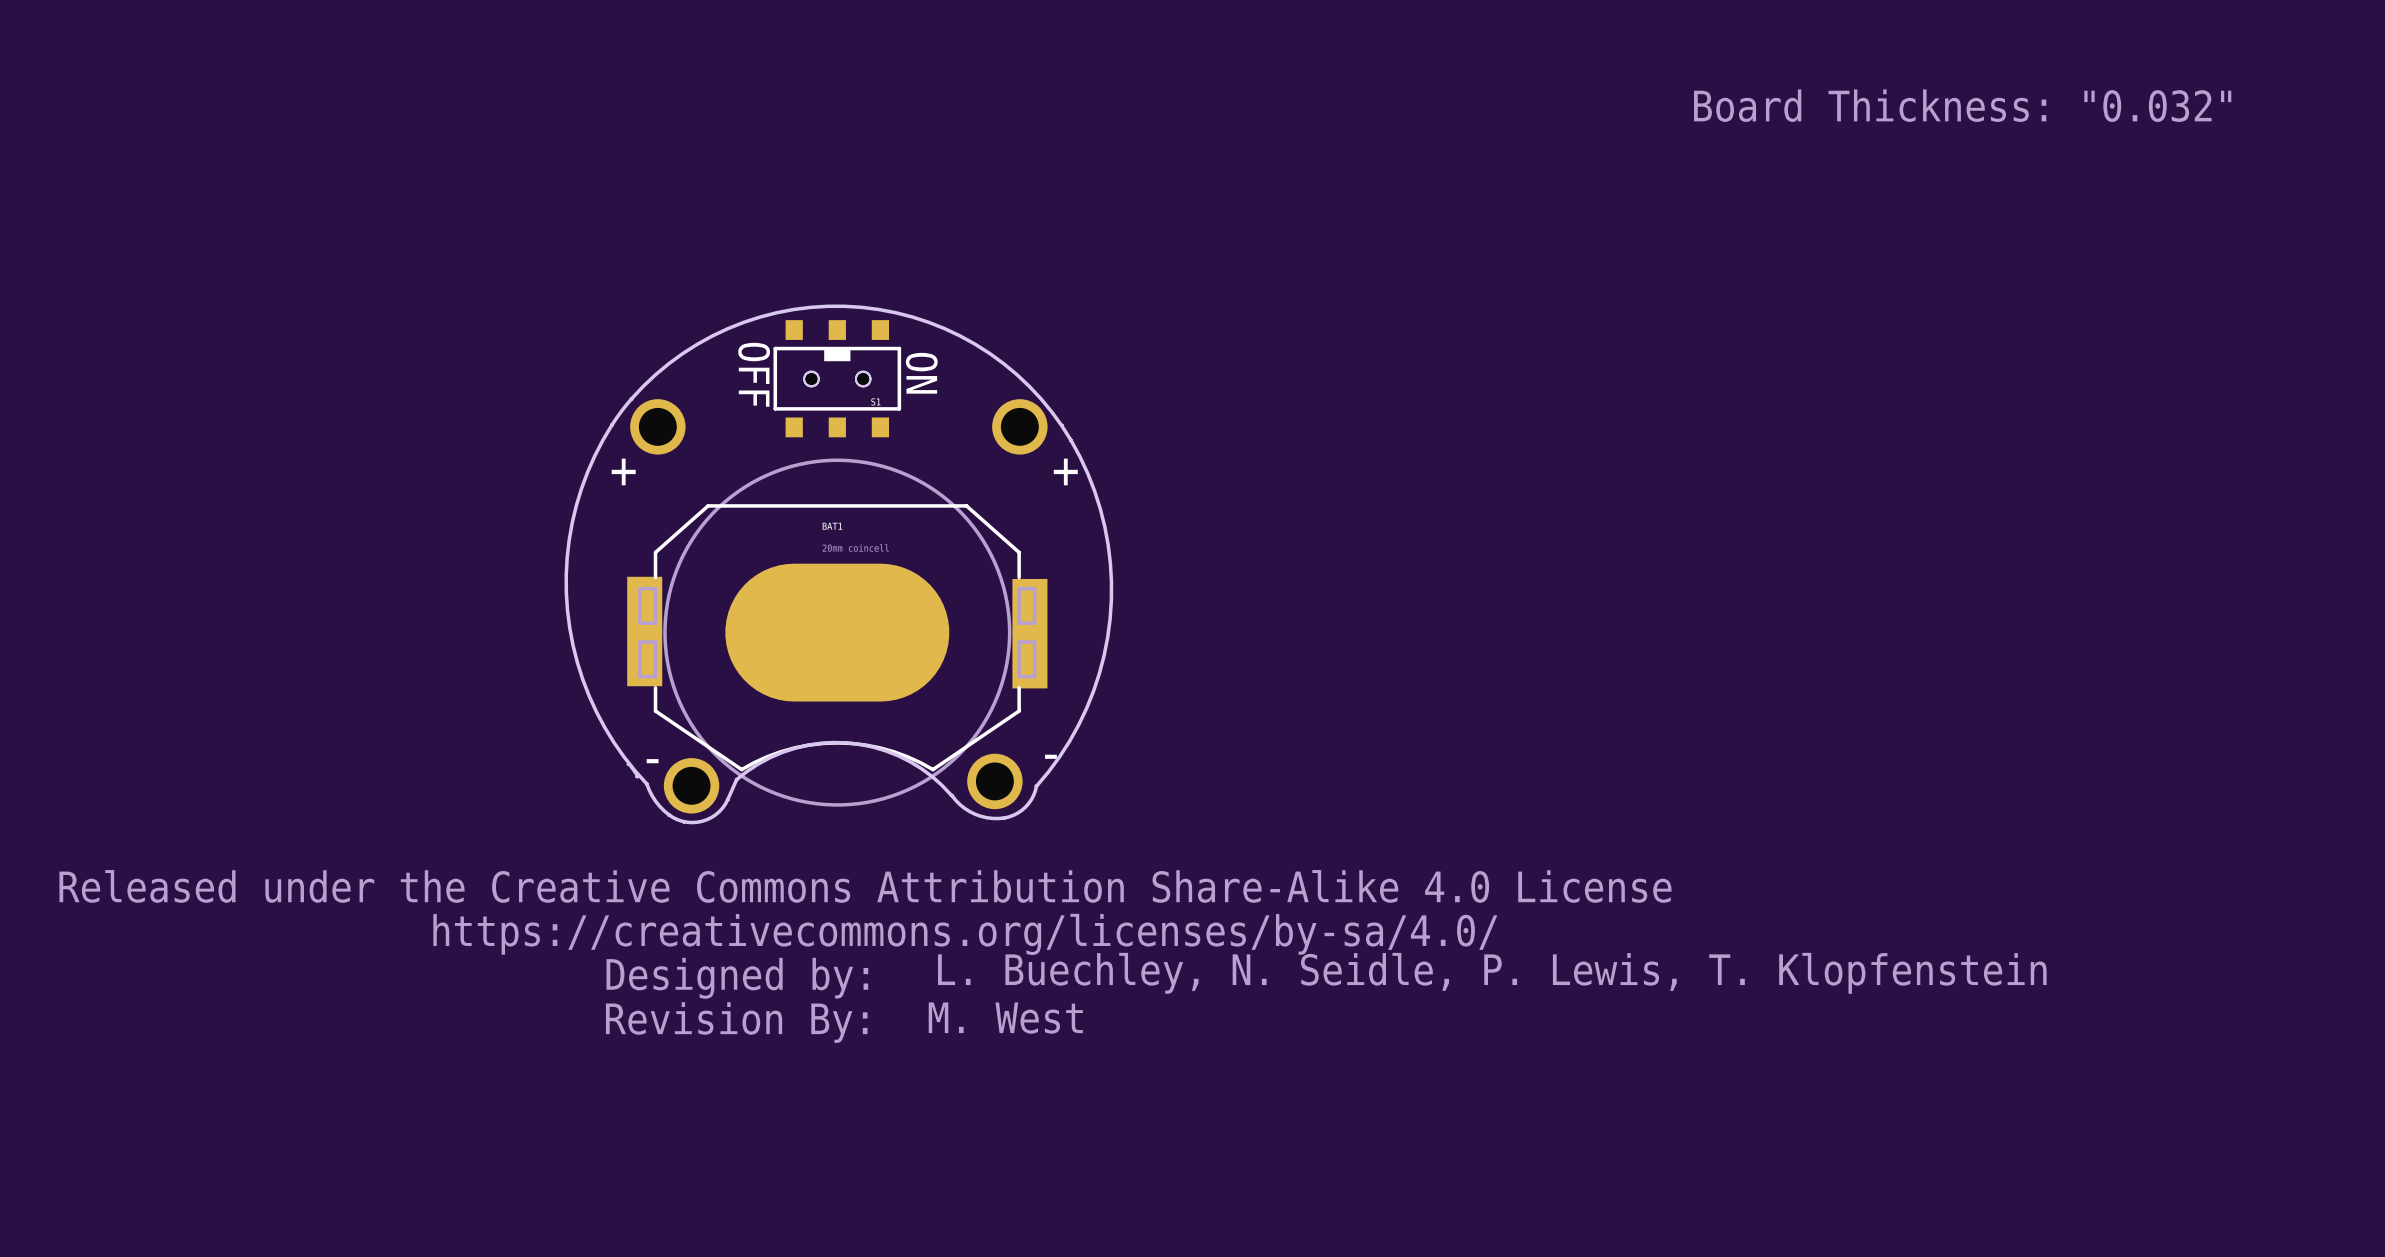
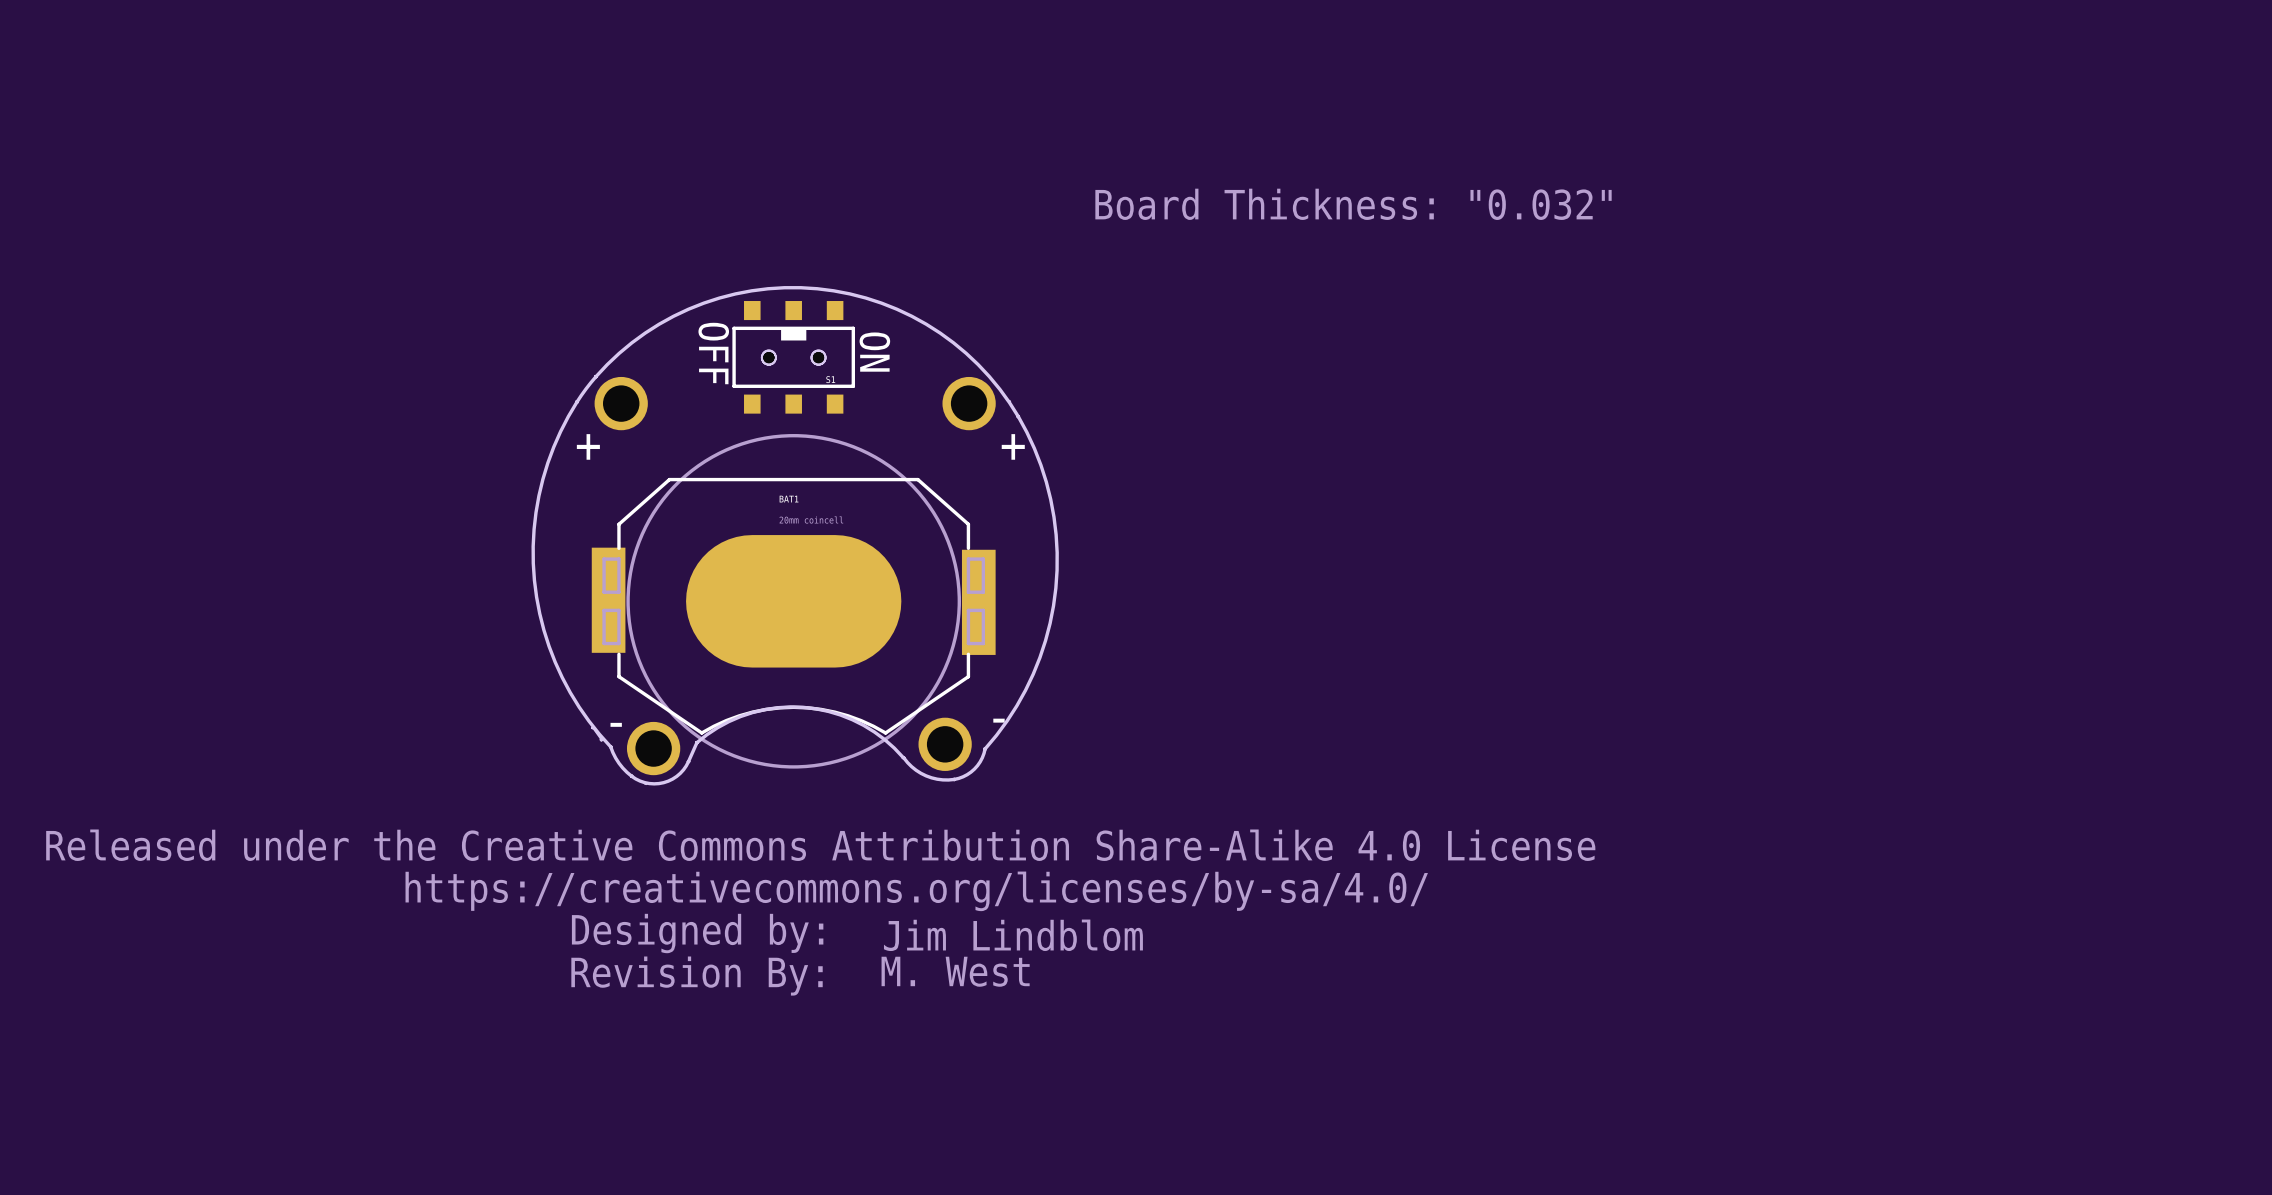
text: Board Thickness: "0.032" (1962, 105) -> none
text: none -> Board Thickness: "0.032" (1353, 204)
text: L. Buechley, N. Seidle, P. Lewis, T. Klopfenstein (1492, 973) -> Jim Lindblom (1013, 935)

